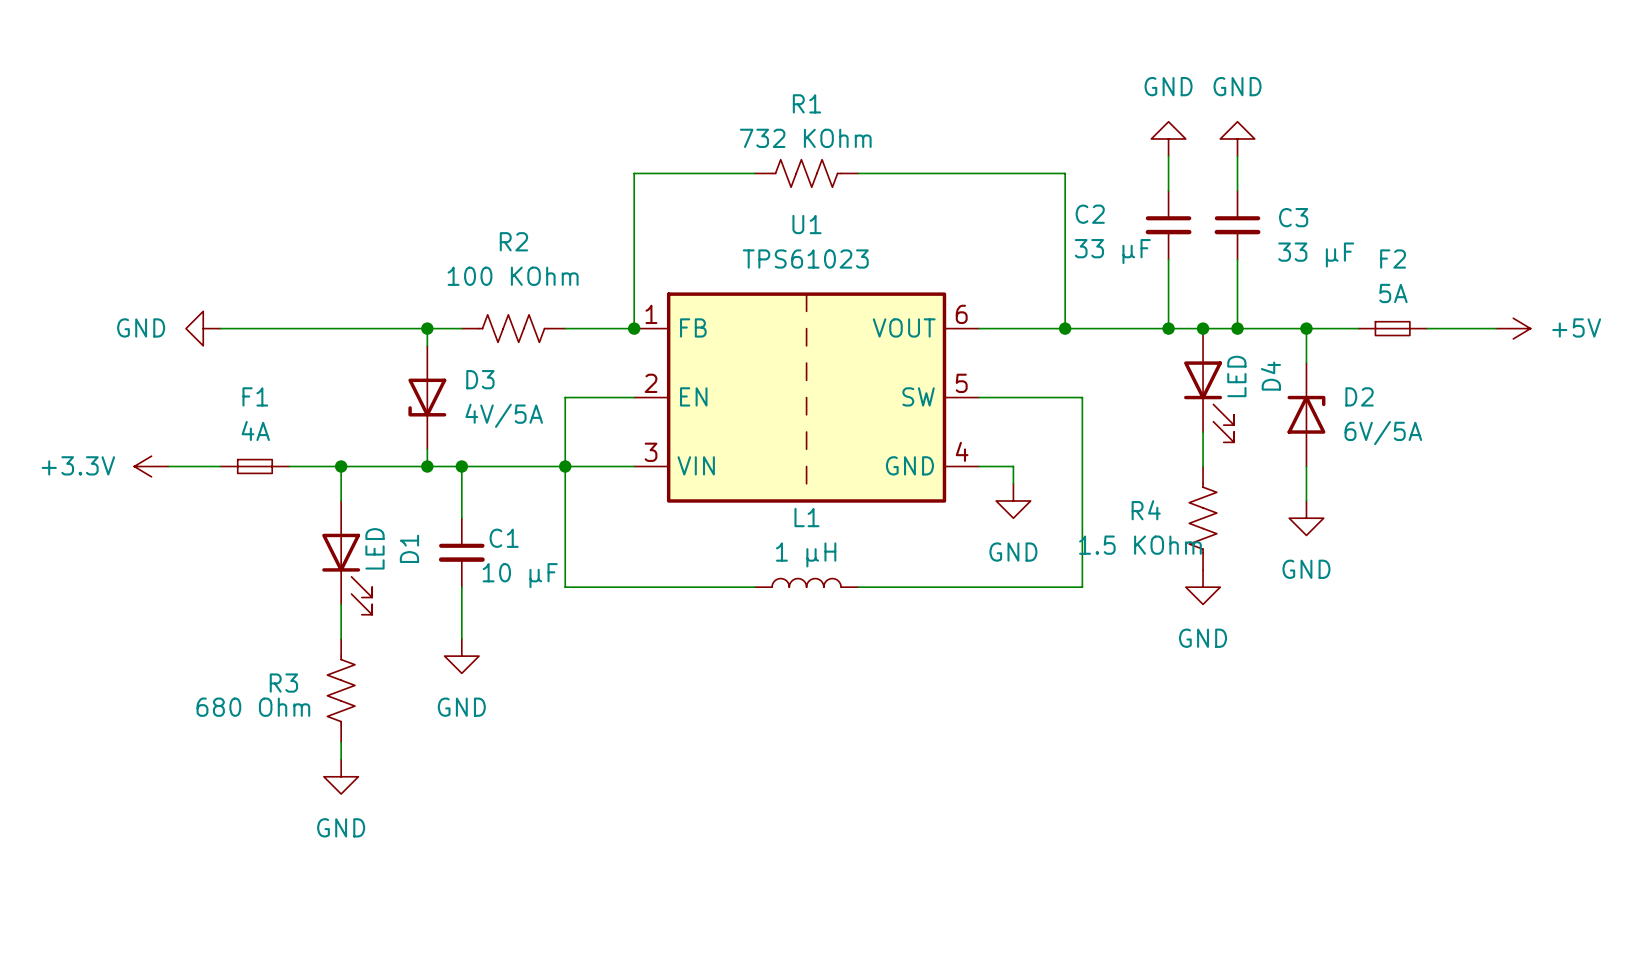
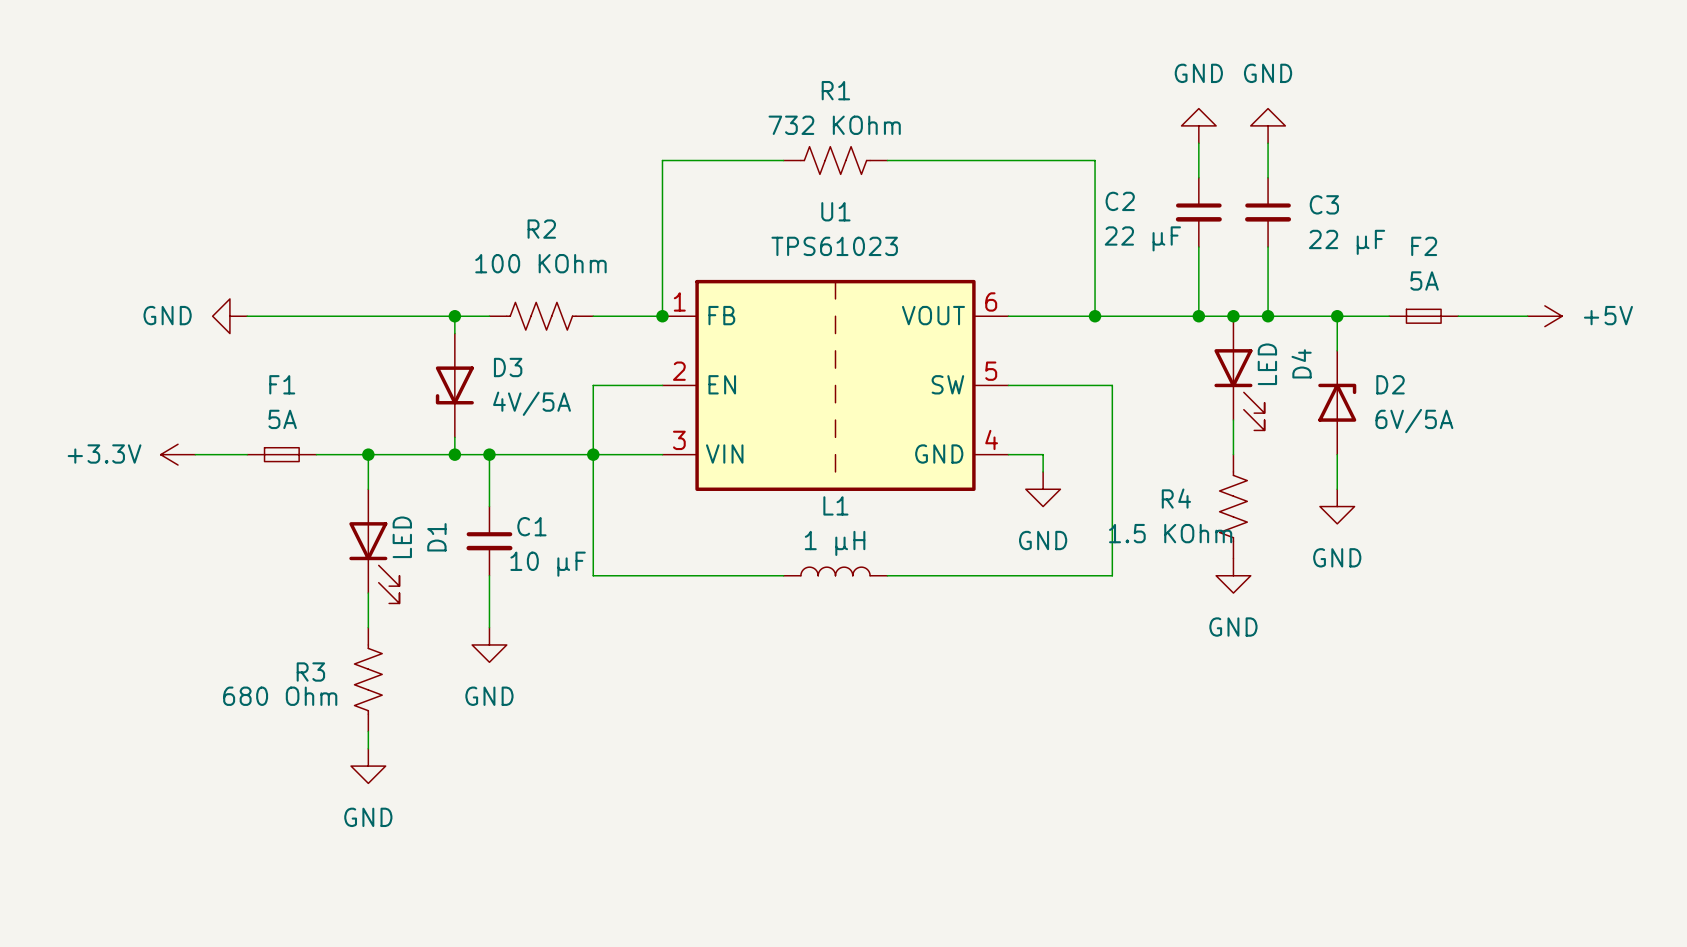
C2 value: 33 μF (1112, 251) -> 22 μF (1142, 238)
C3 value: 33 μF (1316, 254) -> 22 μF (1347, 242)
F1 value: 4A (255, 430) -> 5A (282, 419)

